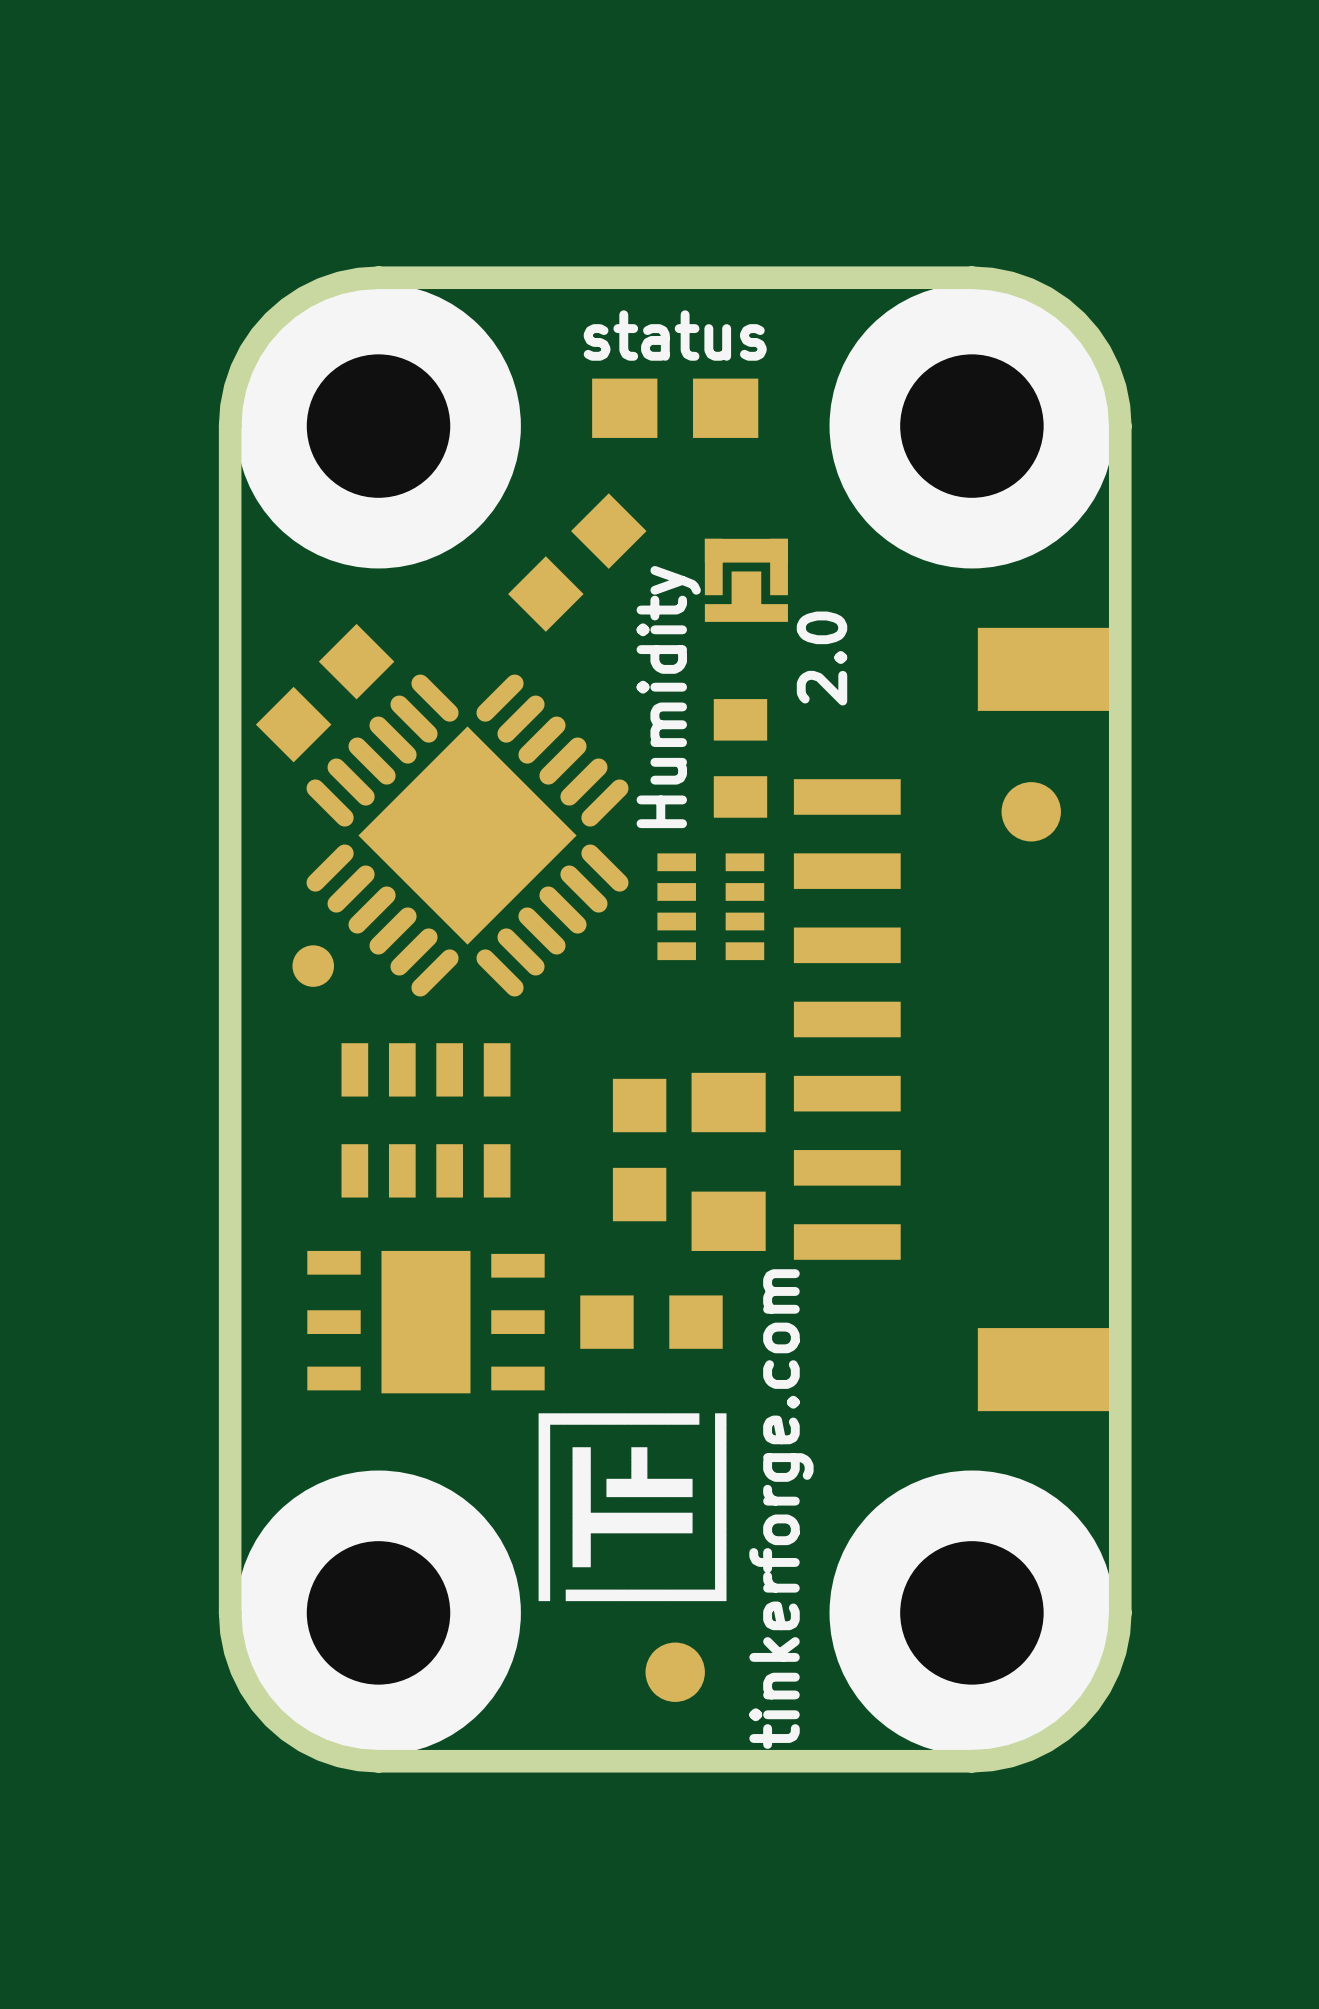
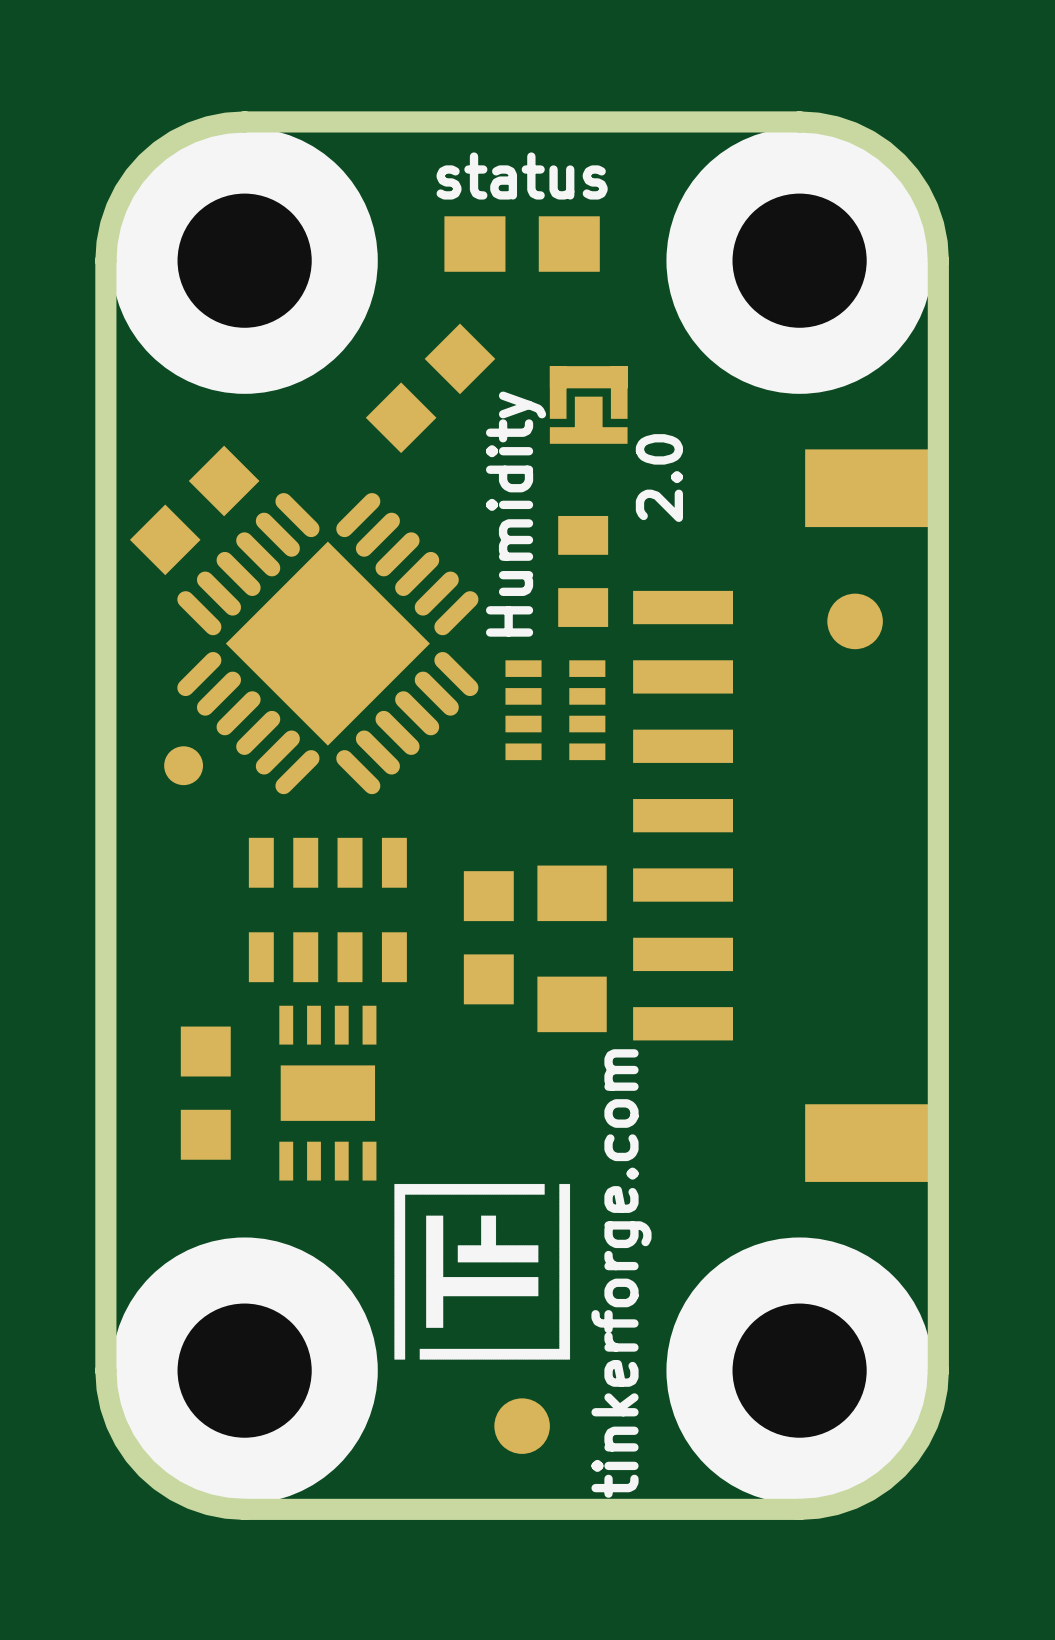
part position: (425, 1120) -> (327, 910)
part footprint: [307, 1250, 545, 1394] -> [279, 1005, 377, 1181]
part rotation: 0° (651, 1322) -> 90° clockwise (205, 1093)
part position: (651, 1322) -> (205, 1093)

